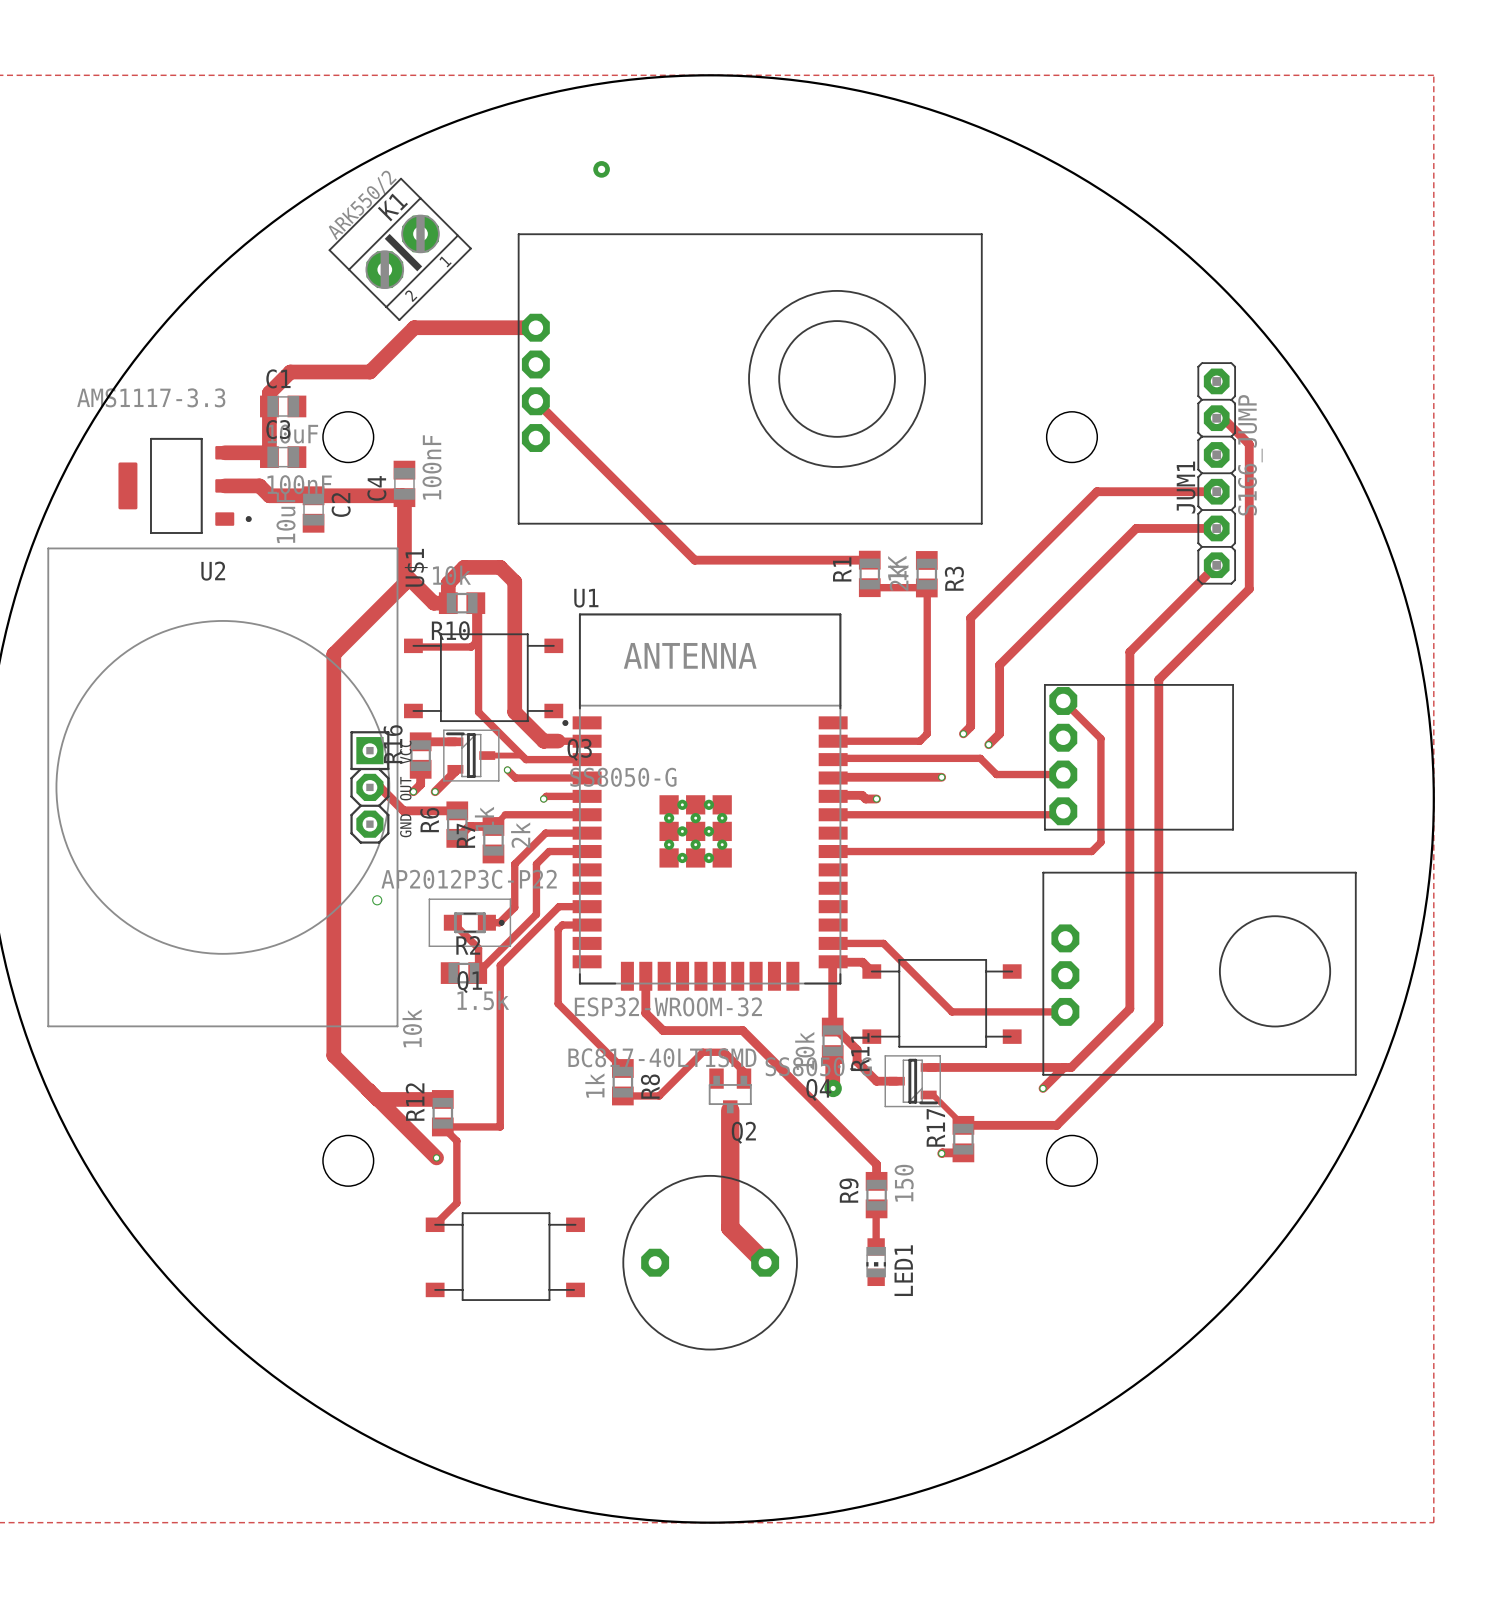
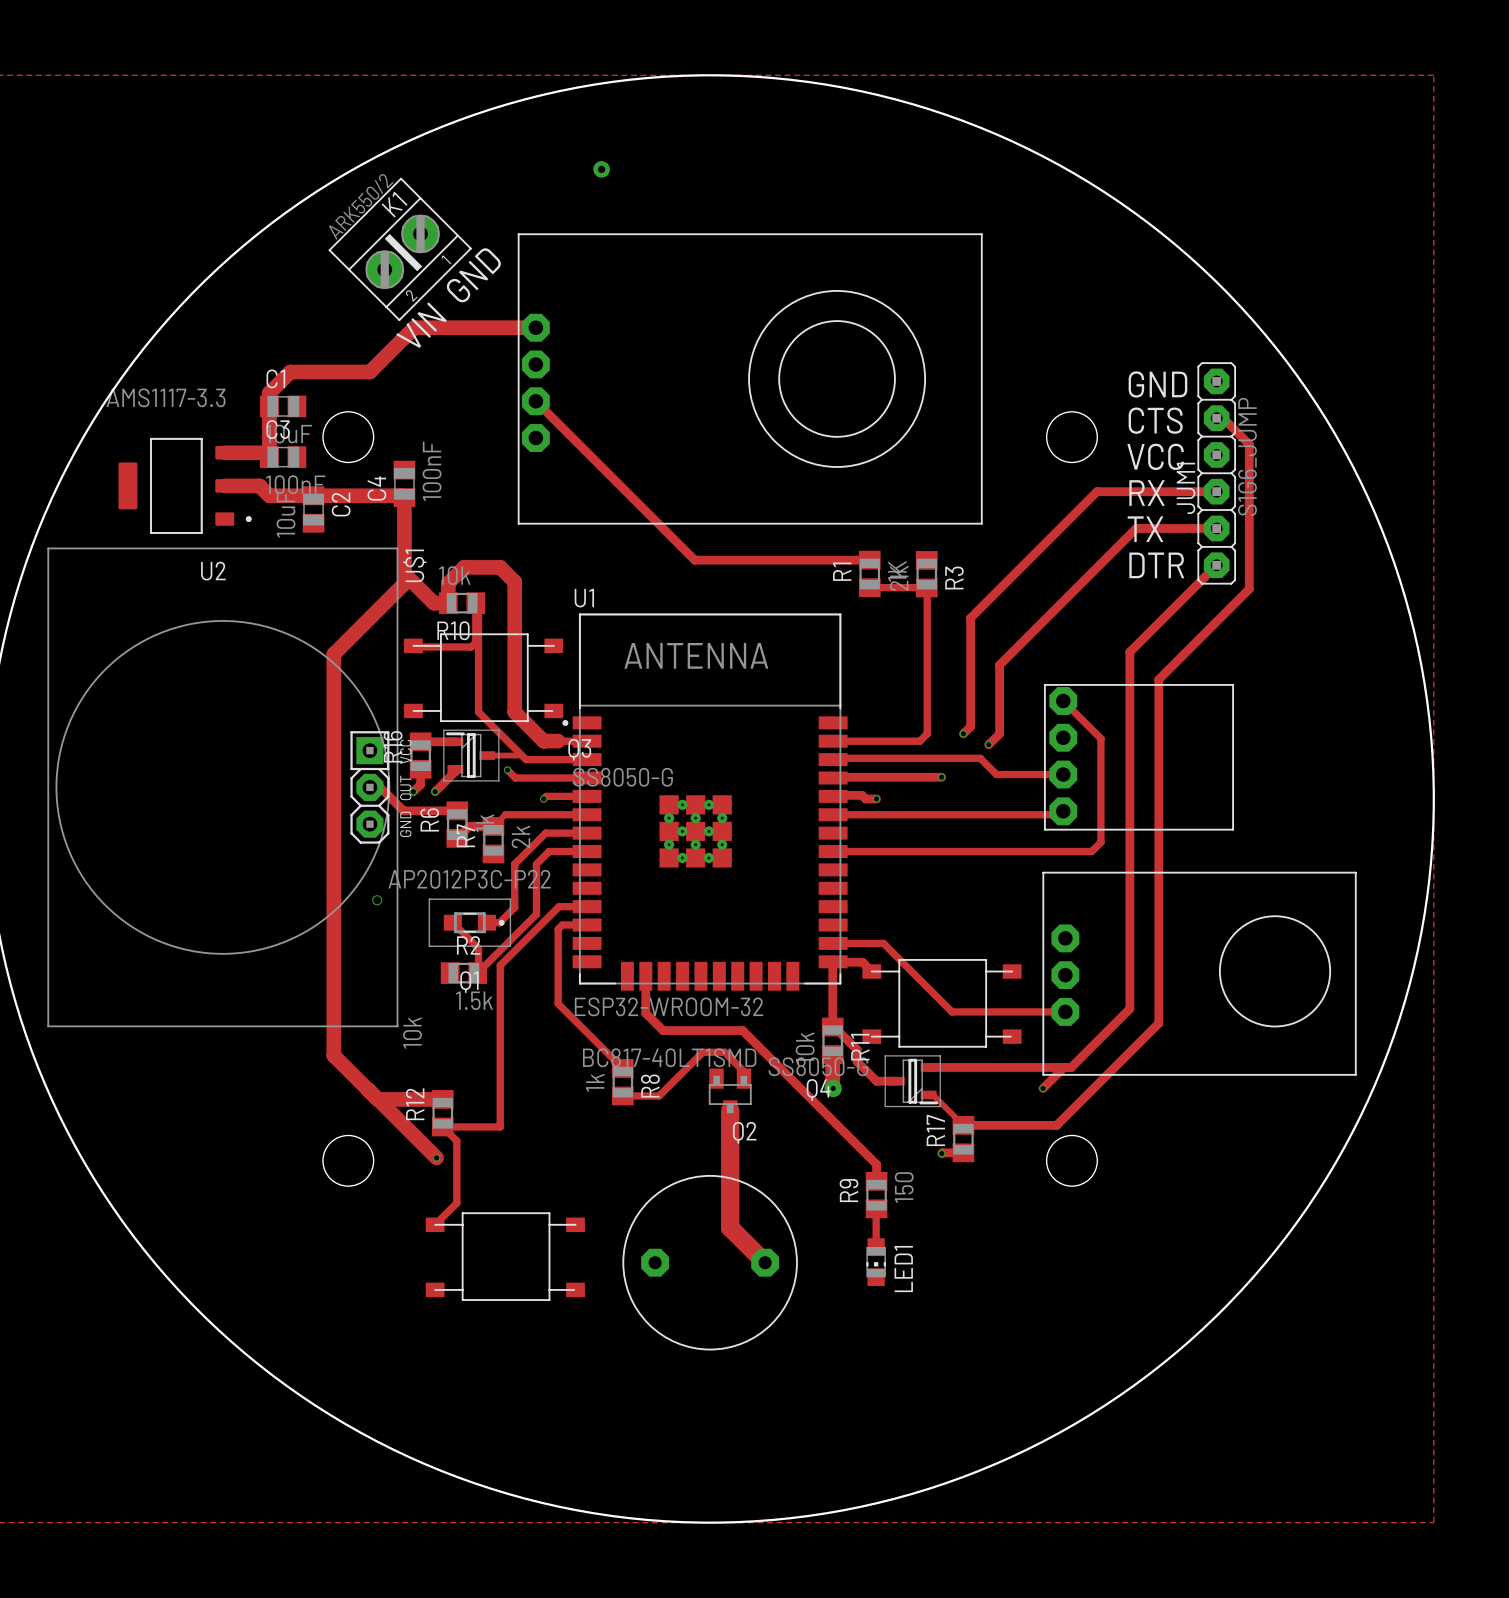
text: none -> GND (473, 275)
text: none -> VIN (421, 325)
text: none -> GND (1157, 384)
text: none -> CTS (1155, 420)
text: none -> VCC (1155, 456)
text: none -> RX (1147, 493)
text: none -> TX (1145, 529)
text: none -> DTR (1156, 565)

